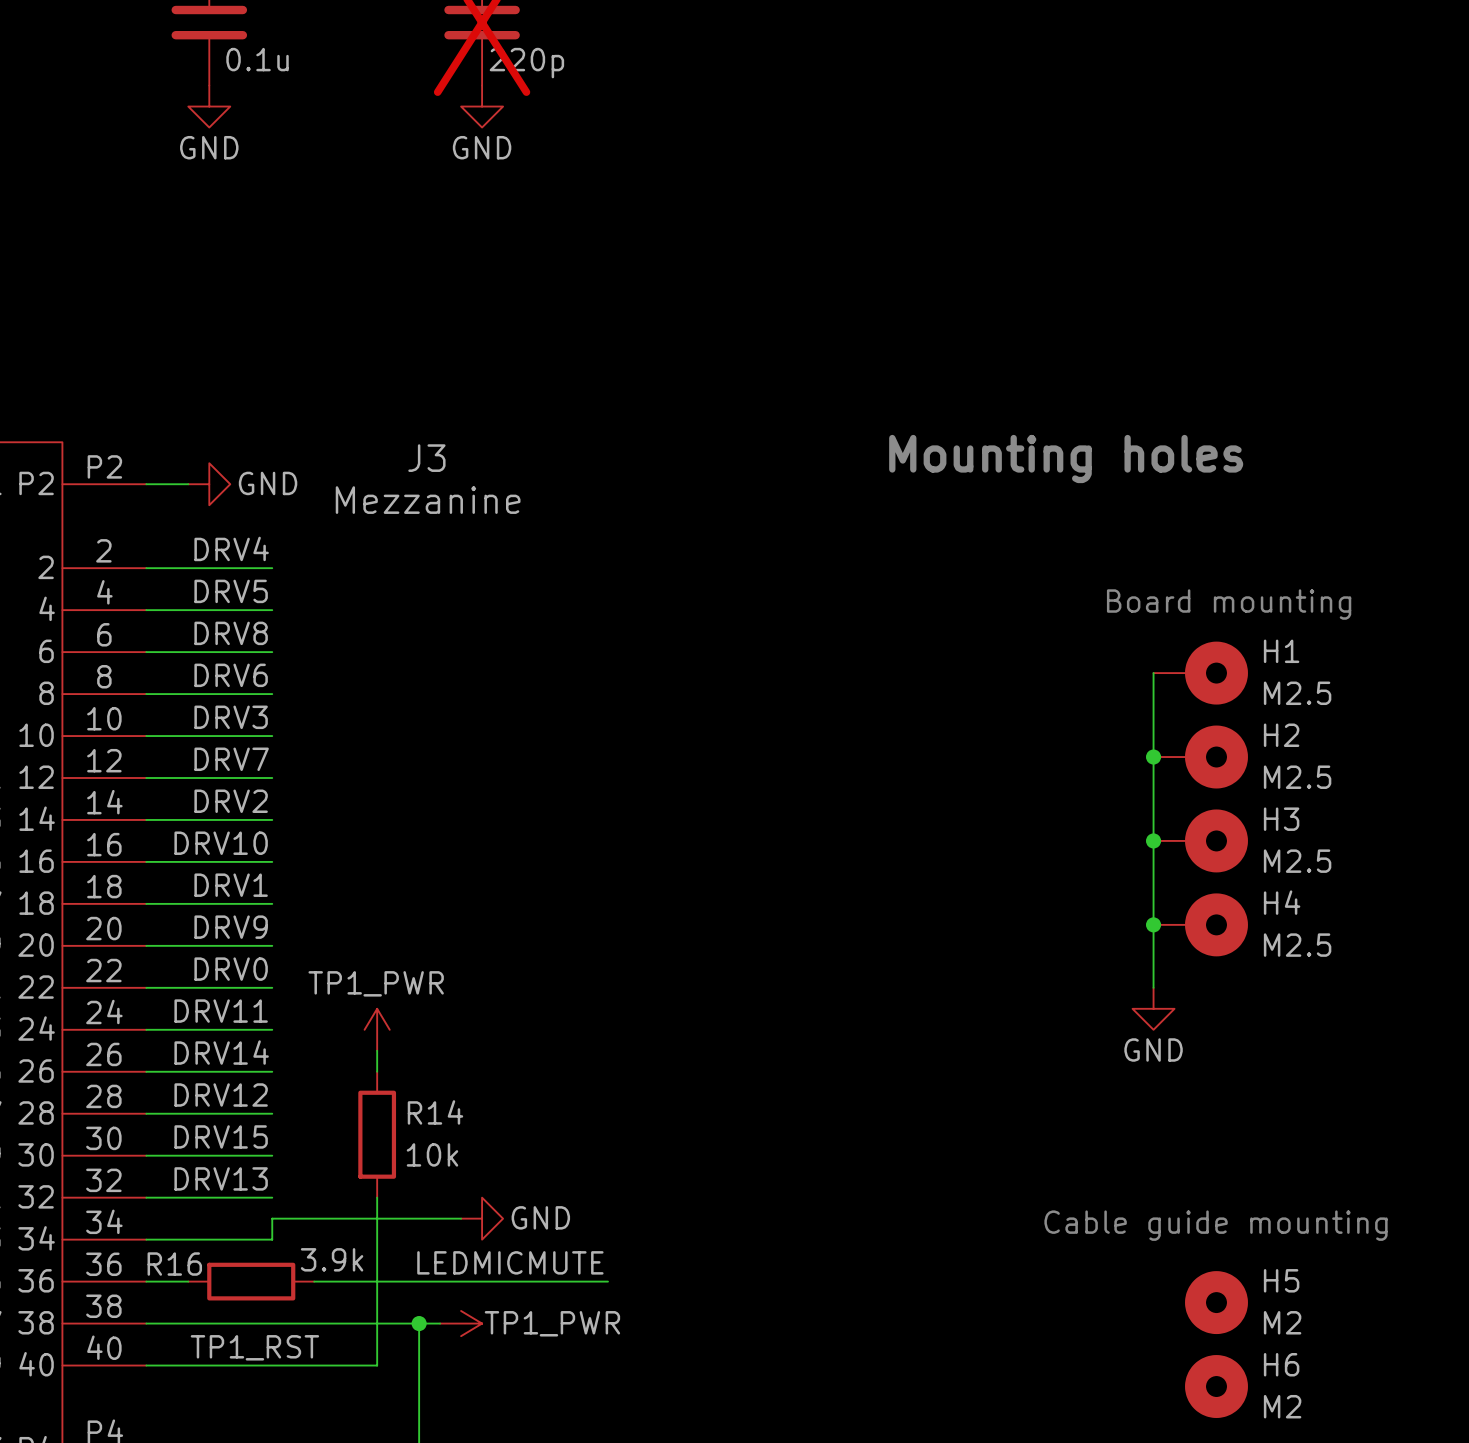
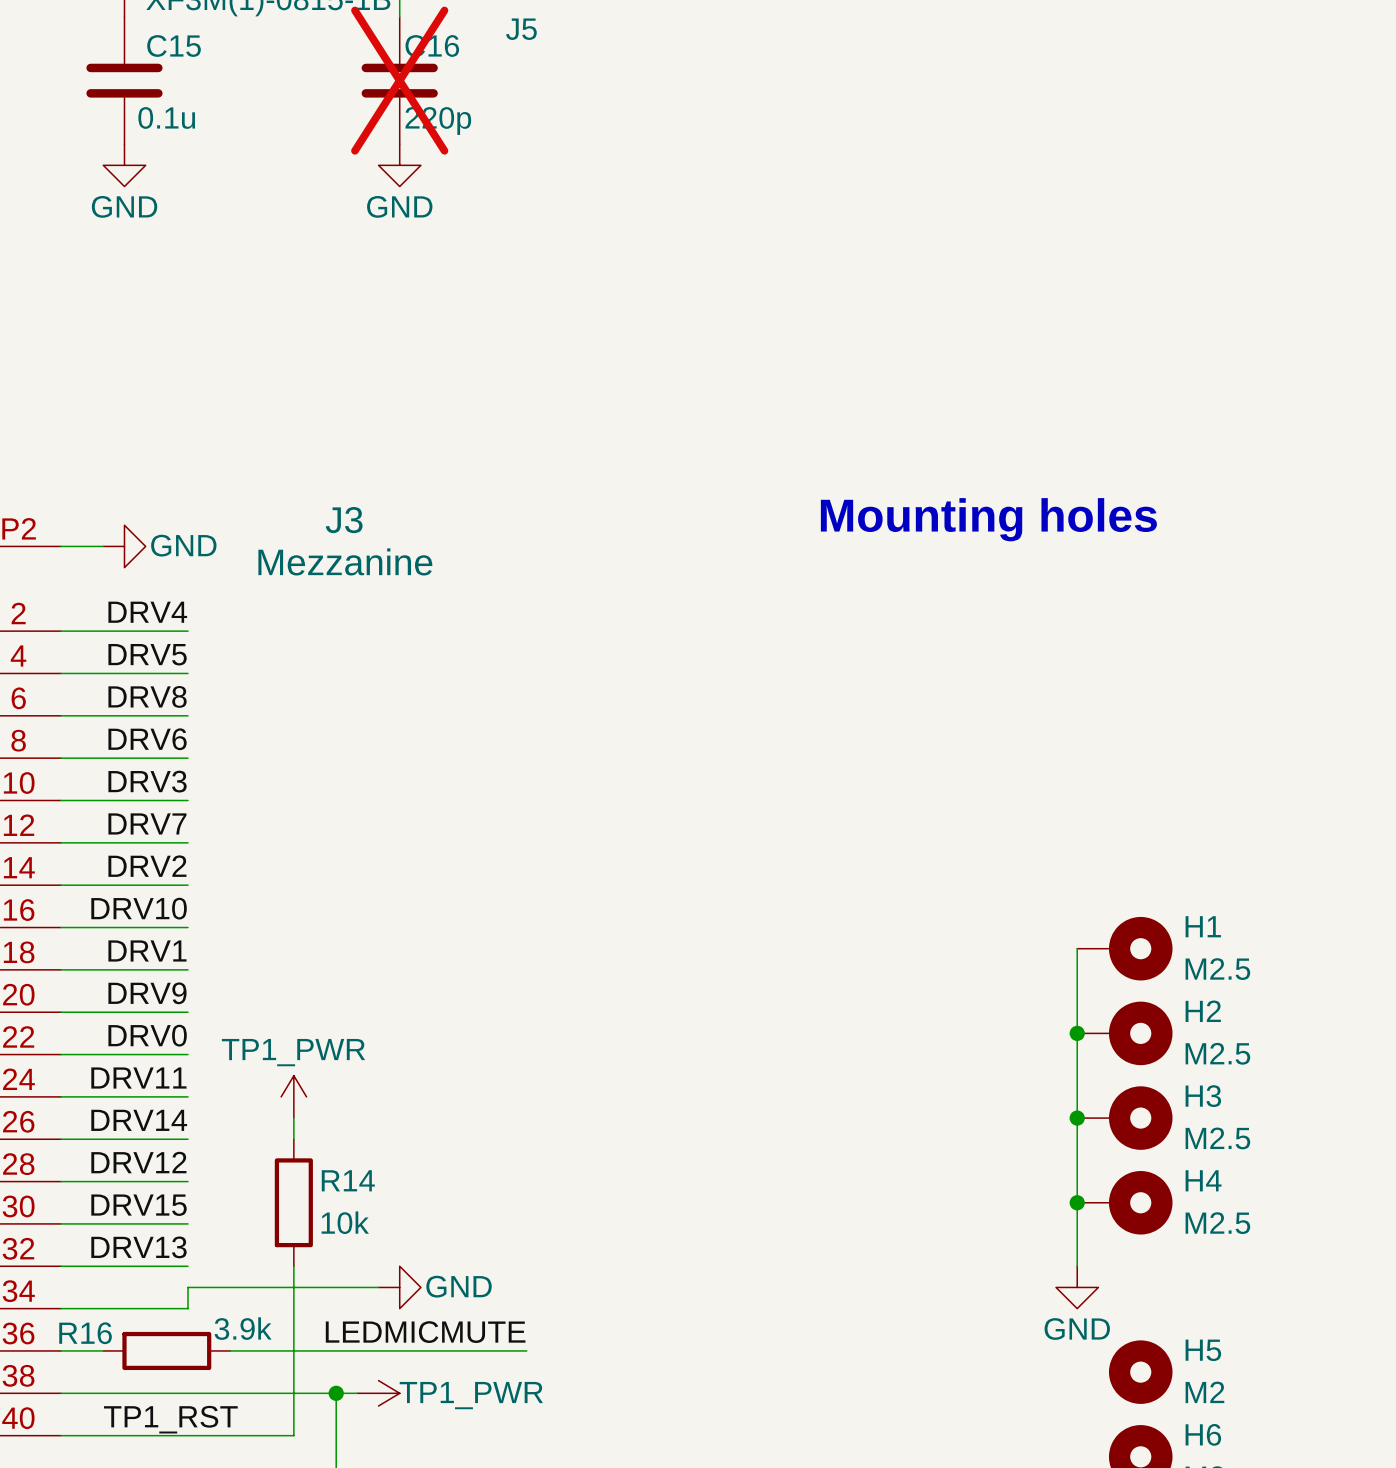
text: Board mounting (1229, 604) -> none
wire: (1153, 673) (1153, 882) -> (1077, 1054) (1077, 1266)
H1 position: (1200, 673) -> (1124, 948)
junction: (1153, 757) -> none
H2 position: (1200, 757) -> (1124, 1033)
junction: (1153, 840) -> none
H3 position: (1200, 840) -> (1124, 1118)
junction position: (1153, 924) -> (1077, 1033)
H4 position: (1200, 924) -> (1124, 1202)
power symbol position: GND (1153, 1008) -> GND (1077, 1287)
junction: none -> (1077, 1118)
junction: none -> (1077, 1202)
text: Cable guide mounting (1215, 1225) -> none

